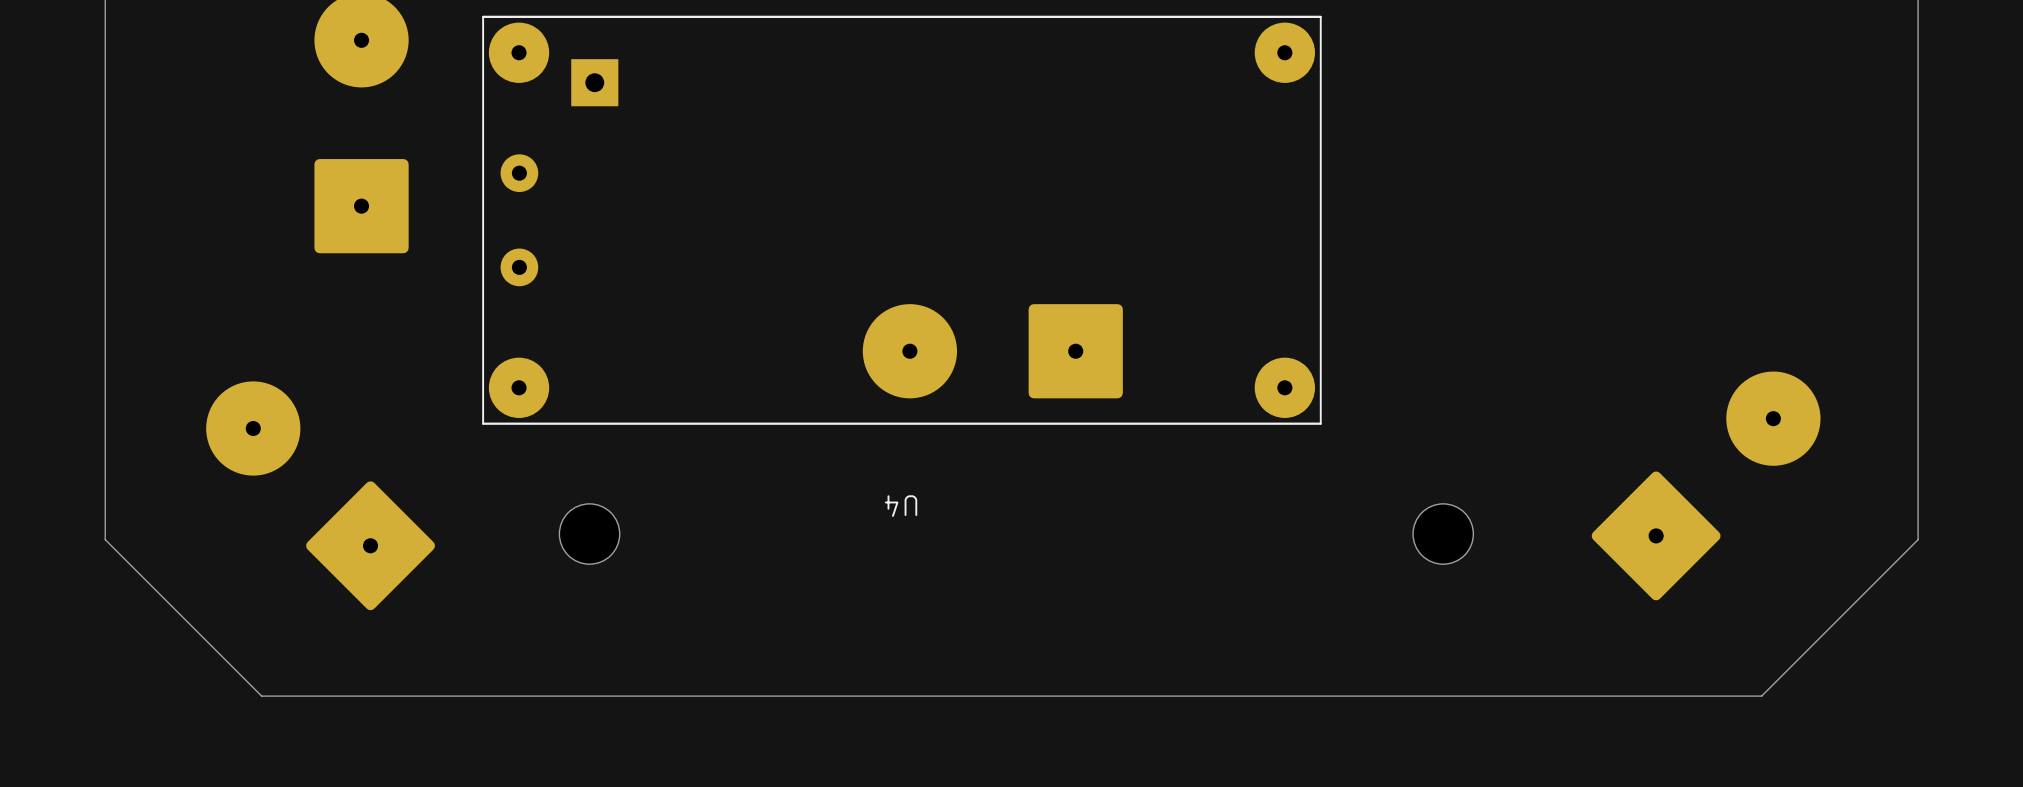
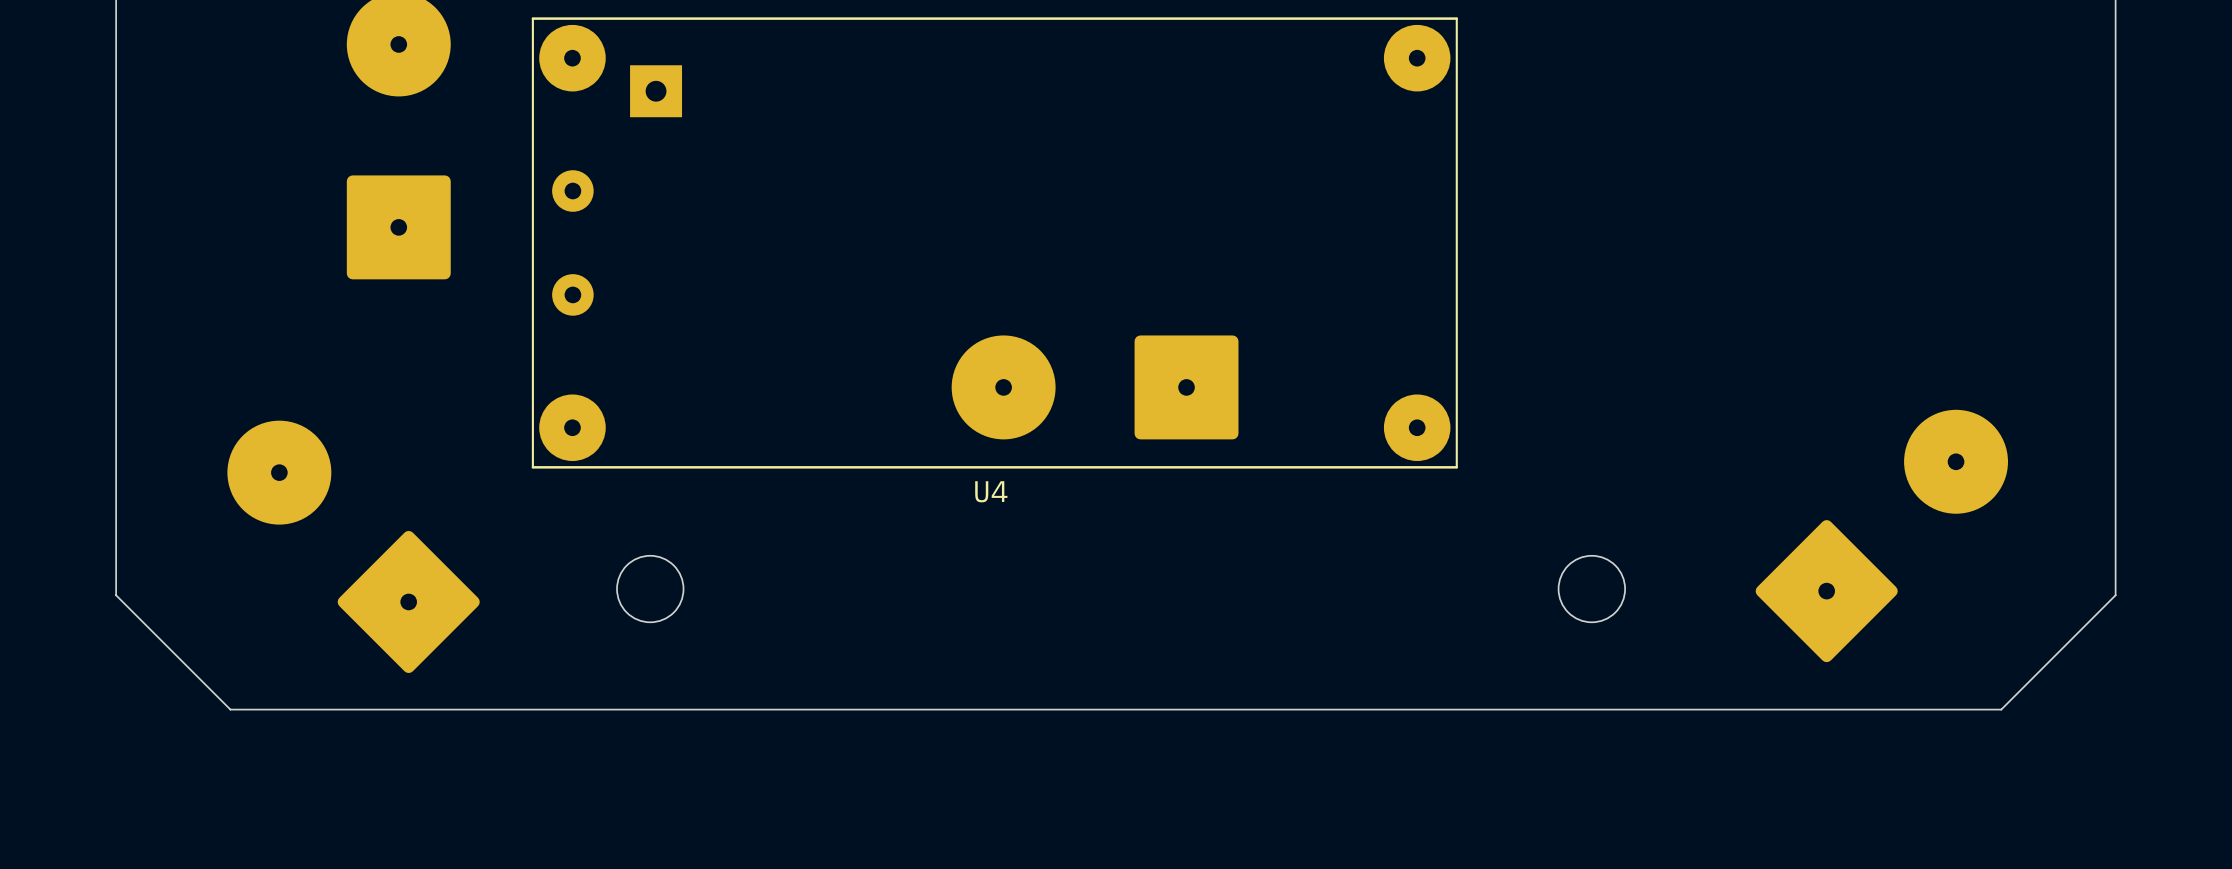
U4 name rotation: 0° (901, 506) -> 180° (991, 491)
U4 name position: U4 (901, 506) -> U4 (991, 491)
board edge: (1814, 643) (1761, 696) (261, 696) (208, 643) -> (2001, 709) (230, 709)

